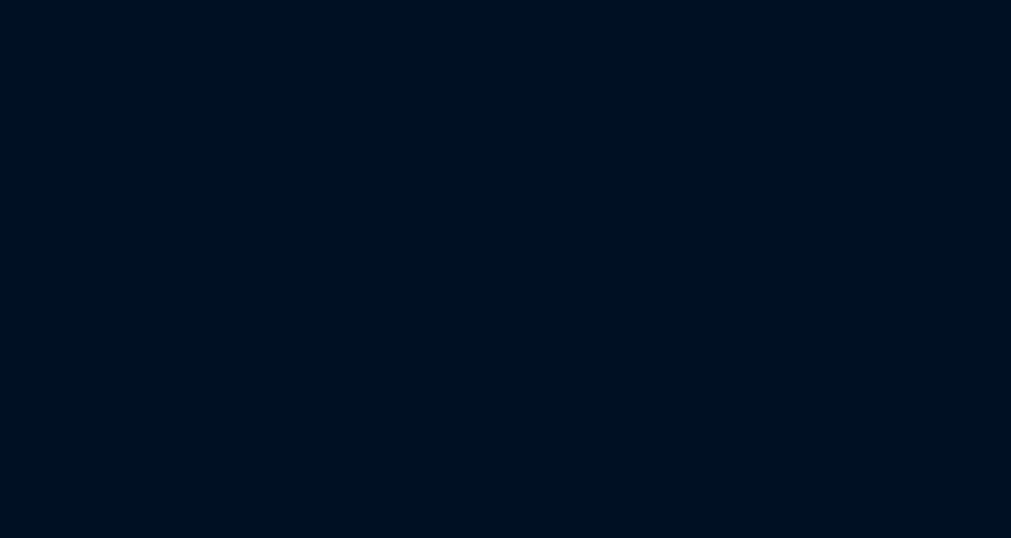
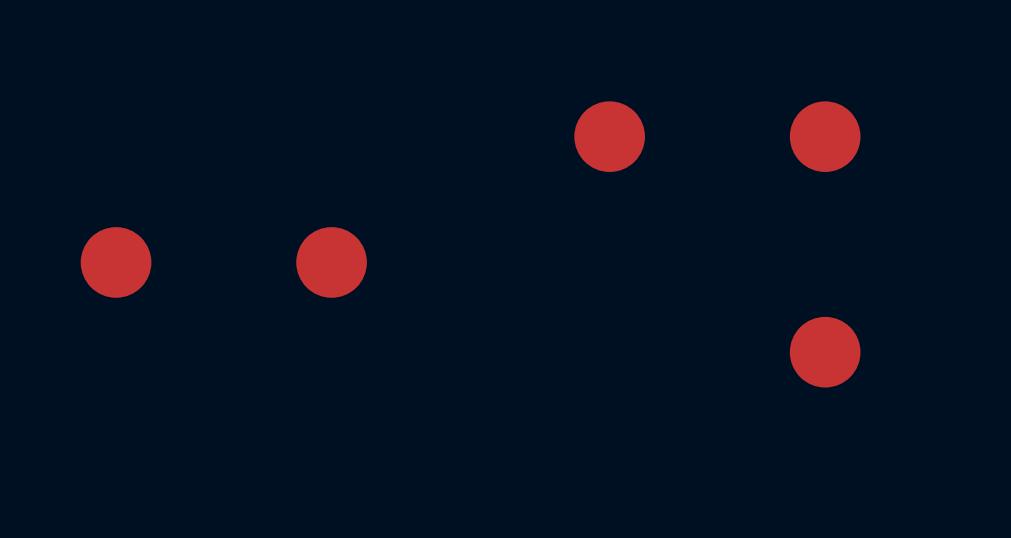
part: none -> (609, 136)
part: none -> (825, 136)
part: none -> (116, 262)
part: none -> (331, 262)
part: none -> (825, 352)

